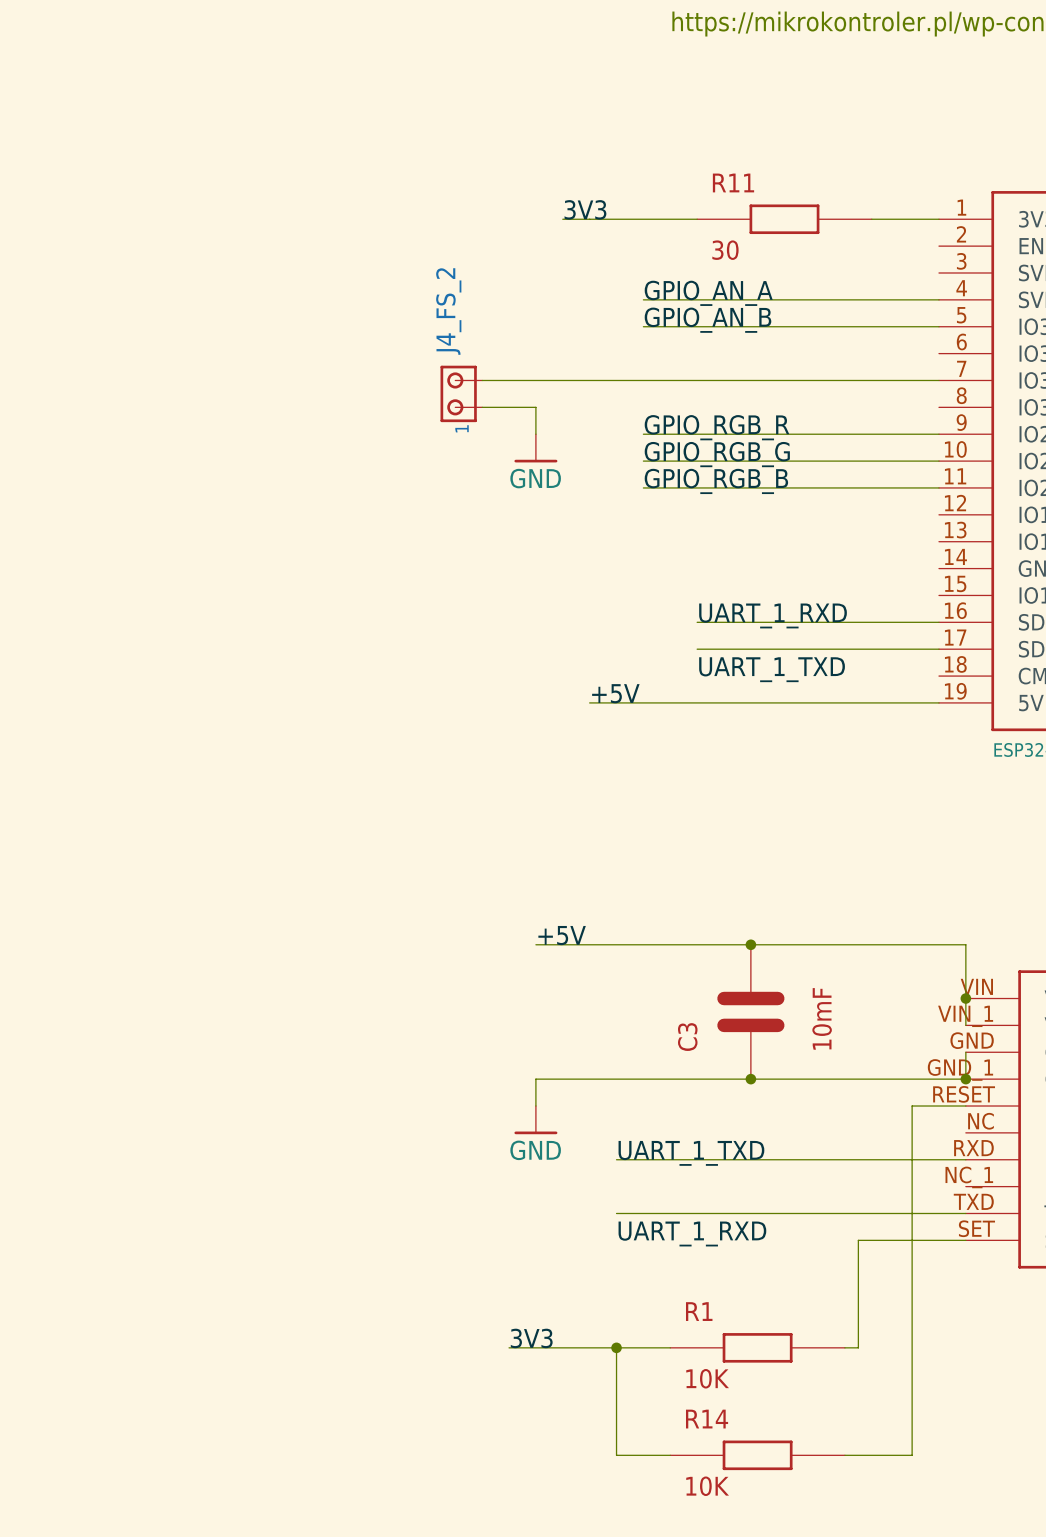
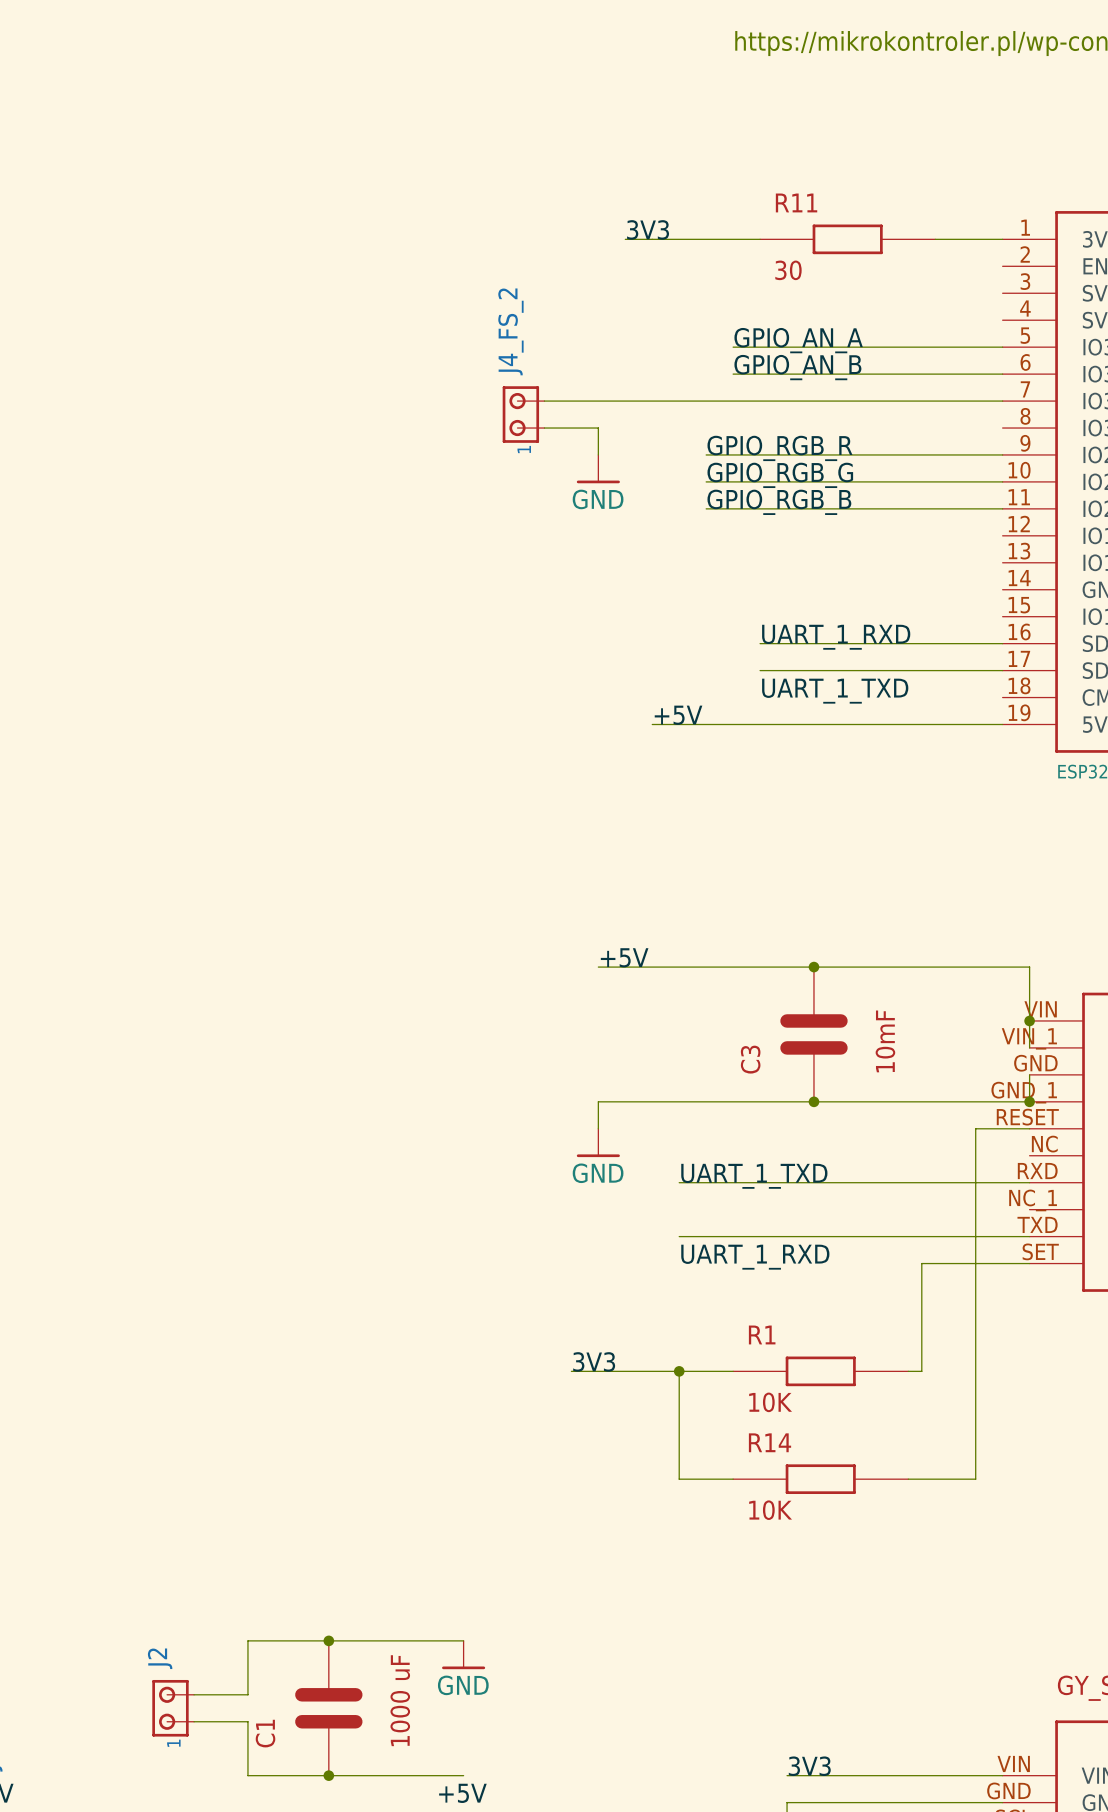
label position: GPIO_AN_A (708, 293) -> GPIO_AN_A (798, 340)
wire: (643, 299) (938, 299) -> none
label position: GPIO_AN_B (707, 320) -> GPIO_AN_B (797, 367)
wire: (643, 326) (670, 326) -> none
wire: none -> (733, 374) (1002, 374)

